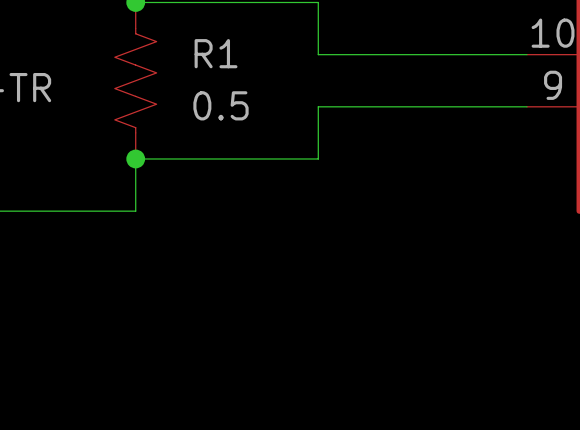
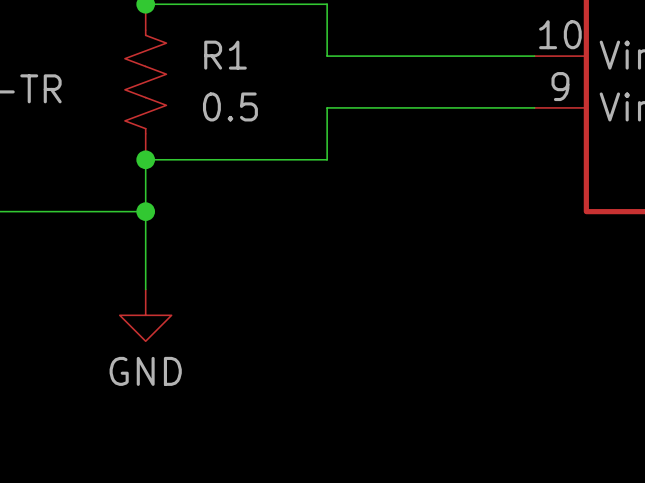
wire: none -> (145, 211) (145, 289)
junction: none -> (145, 211)
power symbol: none -> GND (145, 315)

